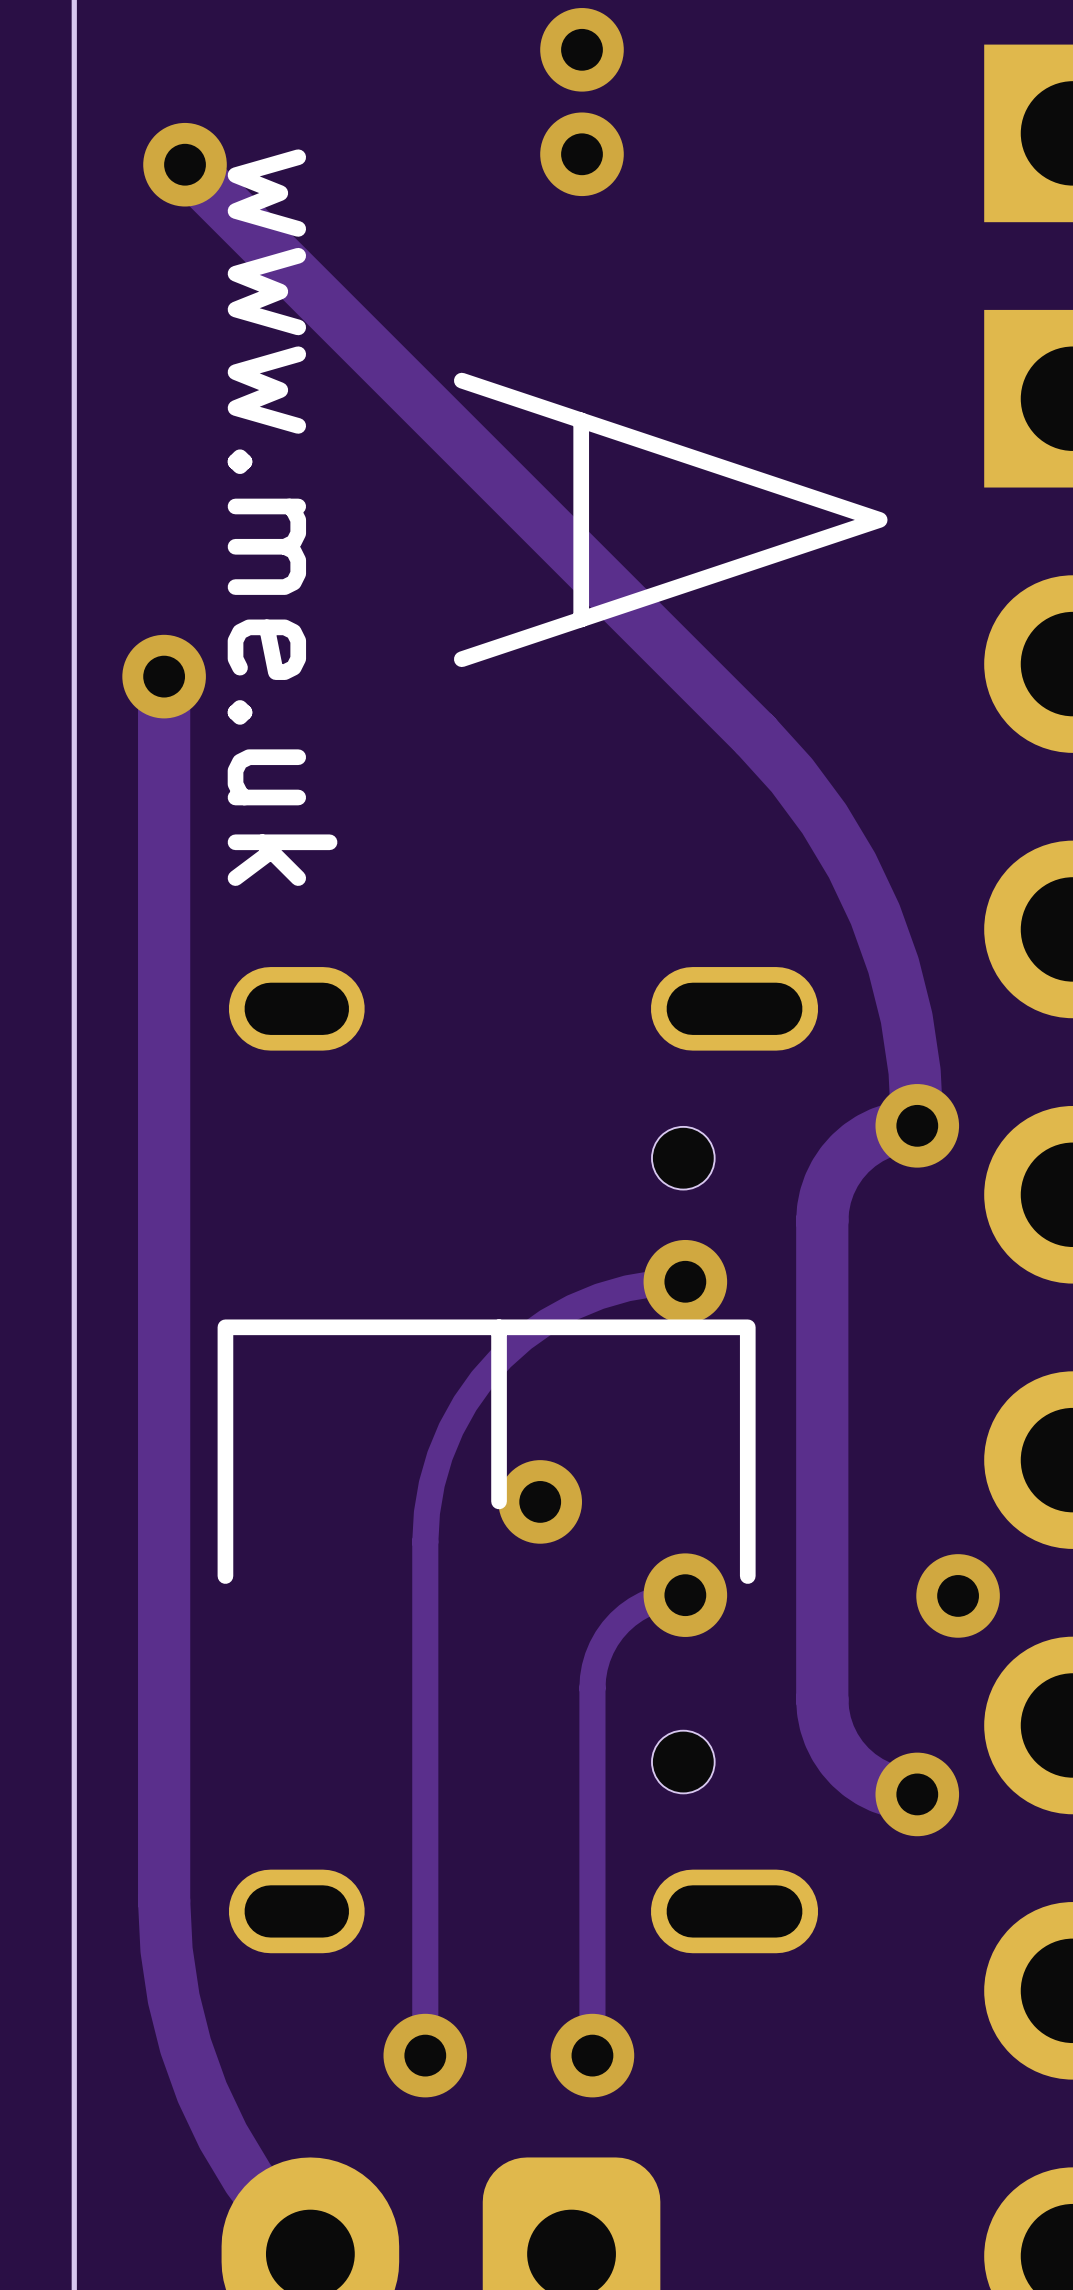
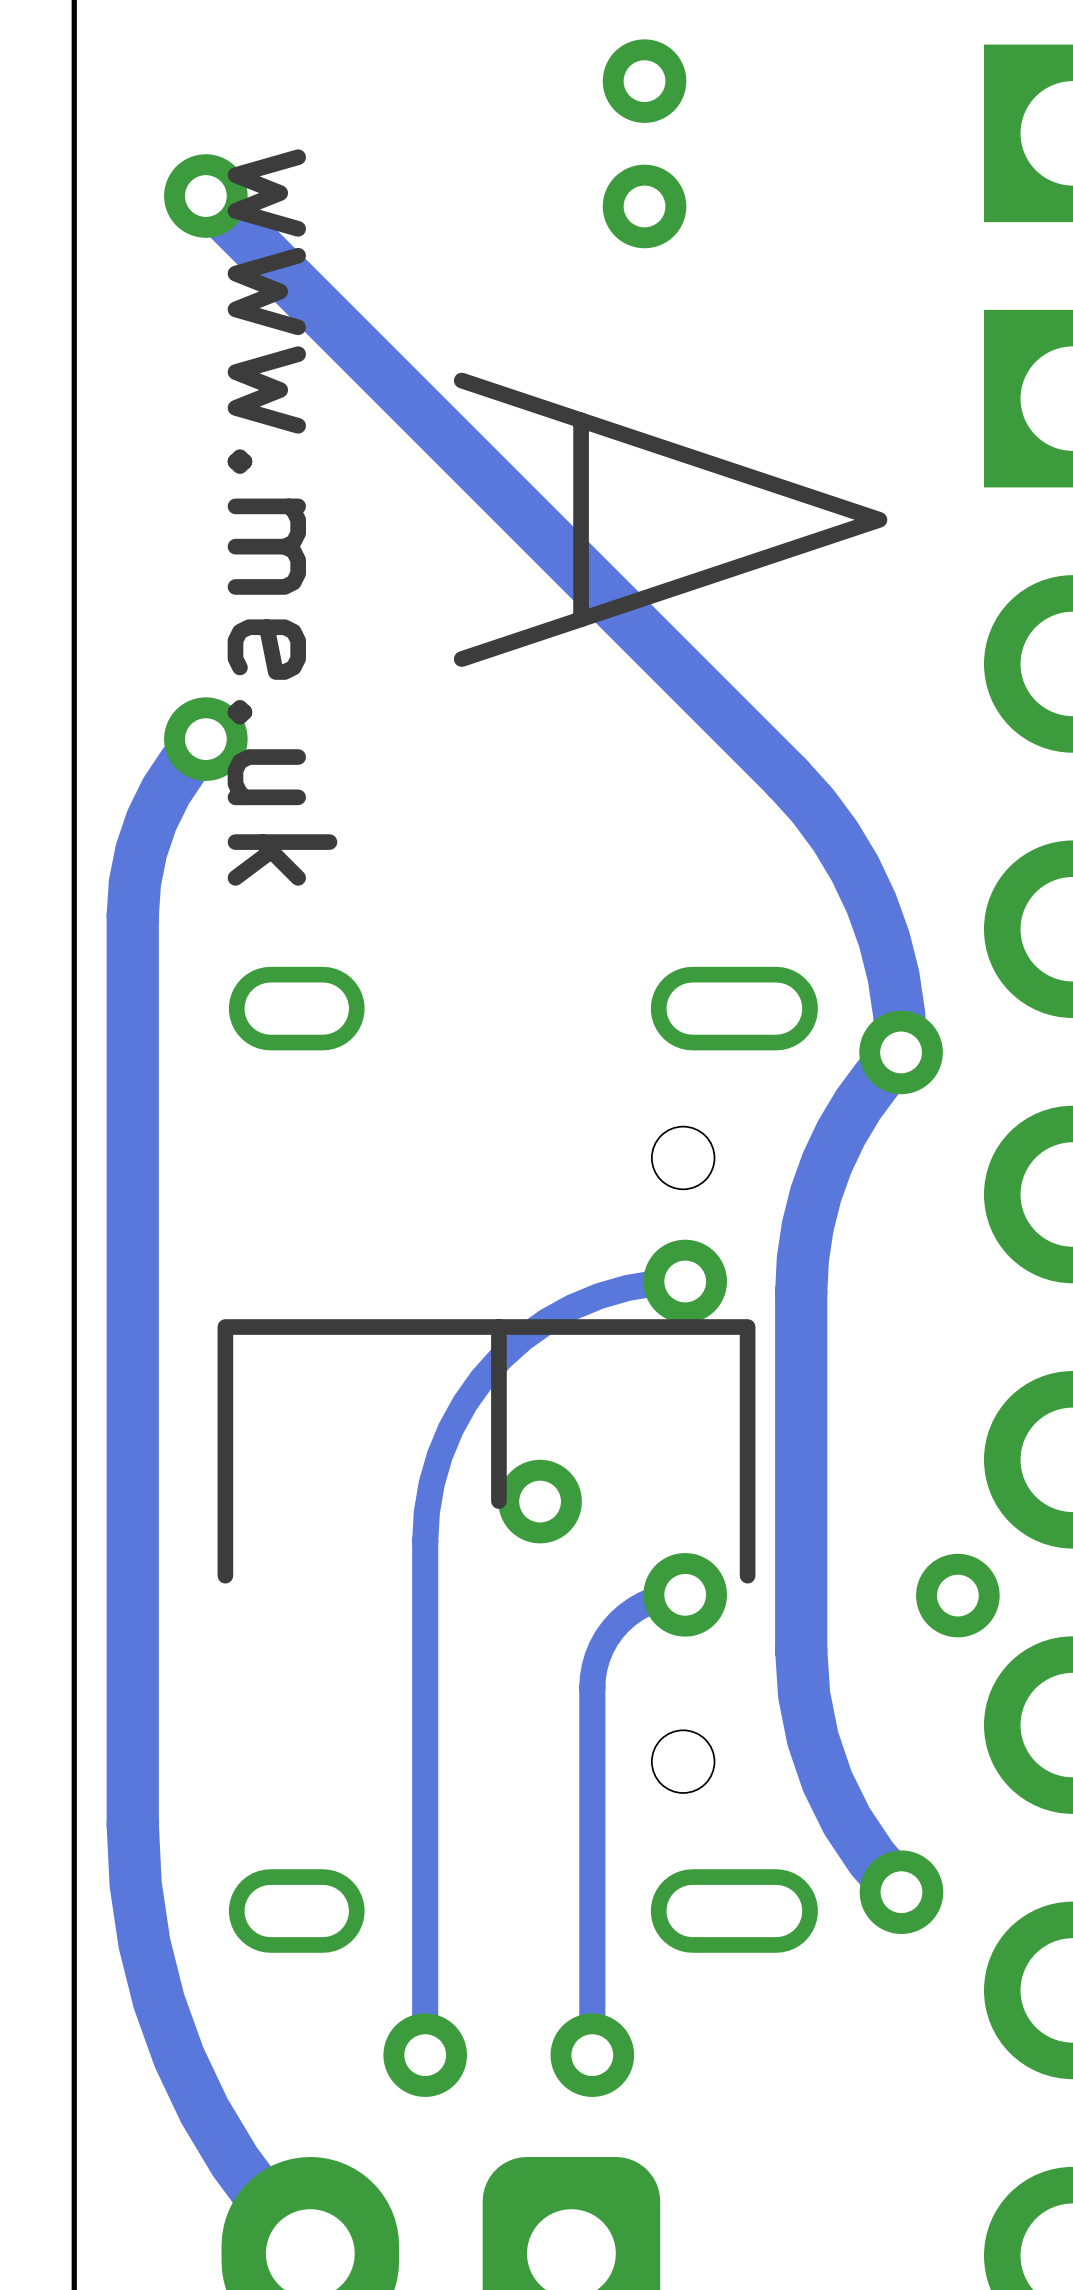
via: (581, 49) -> none
via: none -> (644, 81)
via: (581, 154) -> none
track: (185, 164) (755, 735) (791, 775) (824, 818) (852, 865) (875, 914) (893, 965) (906, 1018) (914, 1071) (917, 1125) (892, 1129) (880, 1133) (859, 1145) (841, 1163) (835, 1173) (829, 1184) (823, 1208) (822, 1699) (825, 1724) (829, 1735) (841, 1757) (850, 1766) (859, 1774) (880, 1787) (892, 1791) (917, 1794) -> none
via position: (185, 164) -> (205, 196)
track: none -> (205, 196) (787, 777) (812, 805) (835, 836) (855, 868) (871, 903) (884, 939) (893, 976) (899, 1014) (901, 1052)
via: none -> (644, 206)
track: (164, 676) (164, 1900) (166, 1949) (173, 1998) (185, 2045) (202, 2092) (223, 2136) (248, 2178) (277, 2217) (310, 2254) -> (205, 739) (184, 763) (166, 790) (151, 820) (141, 851) (134, 883) (132, 915) (132, 1824) (135, 1884) (144, 1943) (158, 2000) (178, 2056) (204, 2110) (234, 2161) (270, 2209) (310, 2253)
via position: (164, 676) -> (205, 739)
track: none -> (900, 1053) (878, 1077) (858, 1104) (841, 1132) (827, 1162) (815, 1194) (807, 1226) (802, 1259) (801, 1292) (801, 1650) (804, 1694) (812, 1738) (827, 1781) (847, 1821) (871, 1858) (901, 1892)
via position: (917, 1125) -> (901, 1052)
via position: (917, 1794) -> (901, 1892)

